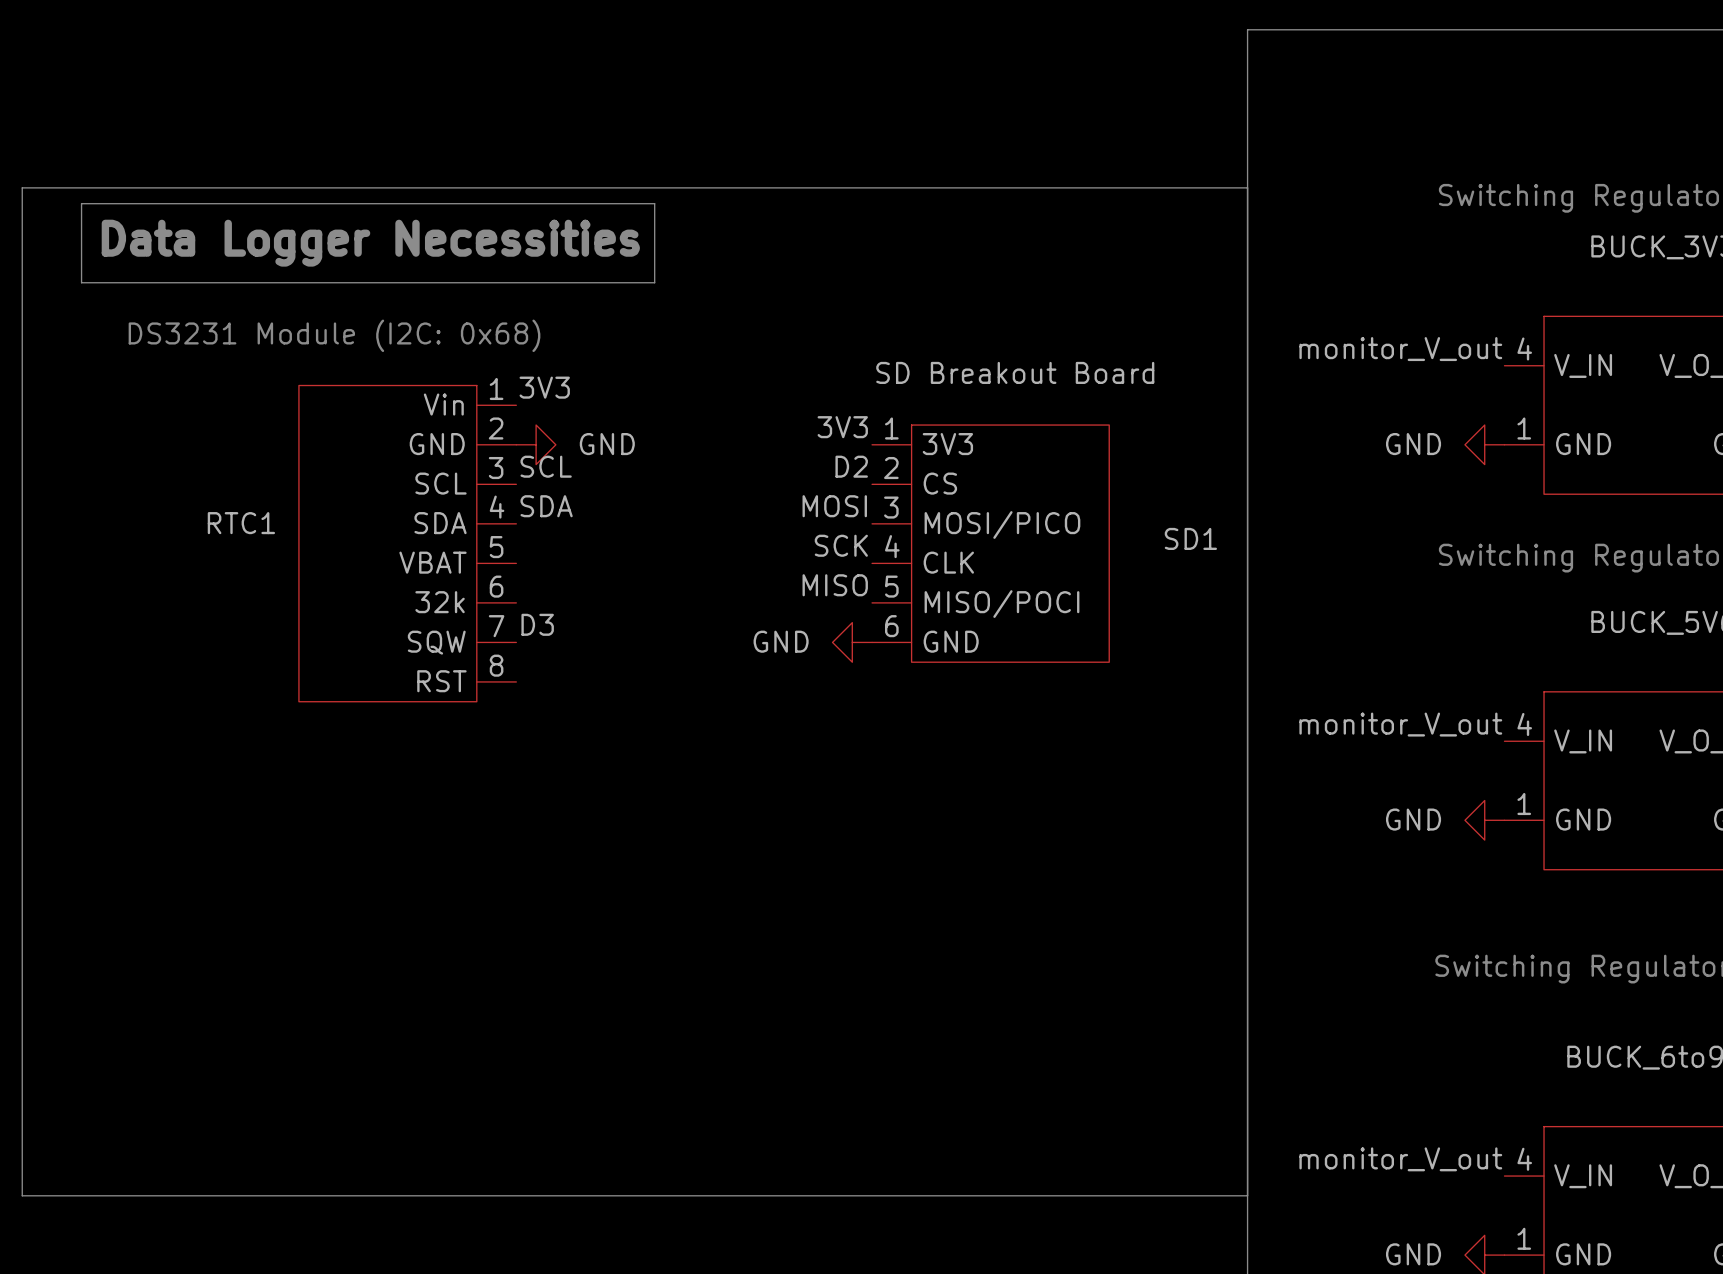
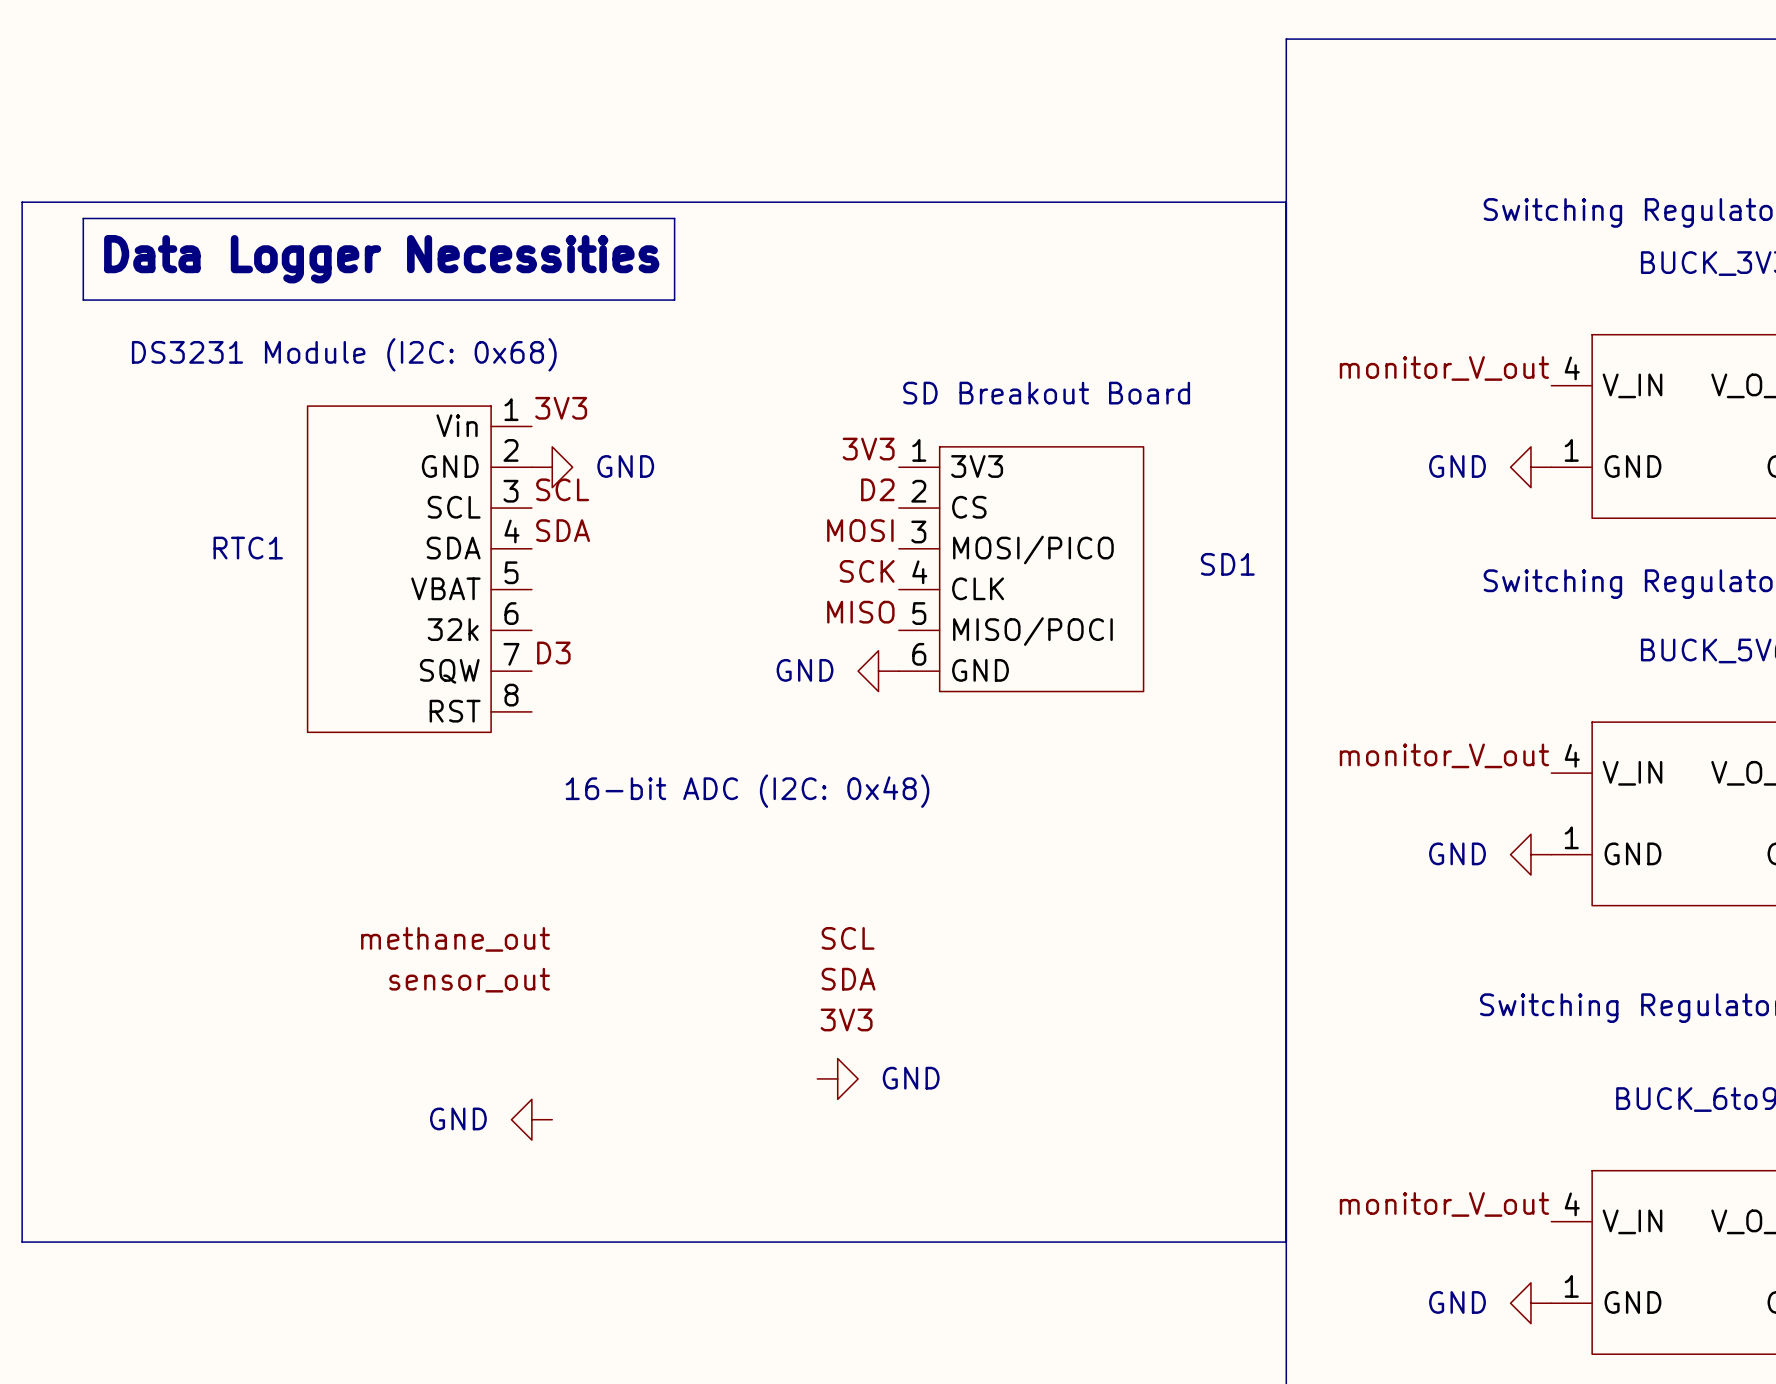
text: none -> 16-bit ADC (I2C: 0x48) (747, 791)
label: none -> SCL (848, 938)
label: none -> methane_out (455, 939)
label: none -> sensor_out (469, 980)
label: none -> SDA (848, 979)
label: none -> 3V3 (846, 1019)
power symbol: none -> GND (837, 1078)
power symbol: none -> GND (531, 1119)

